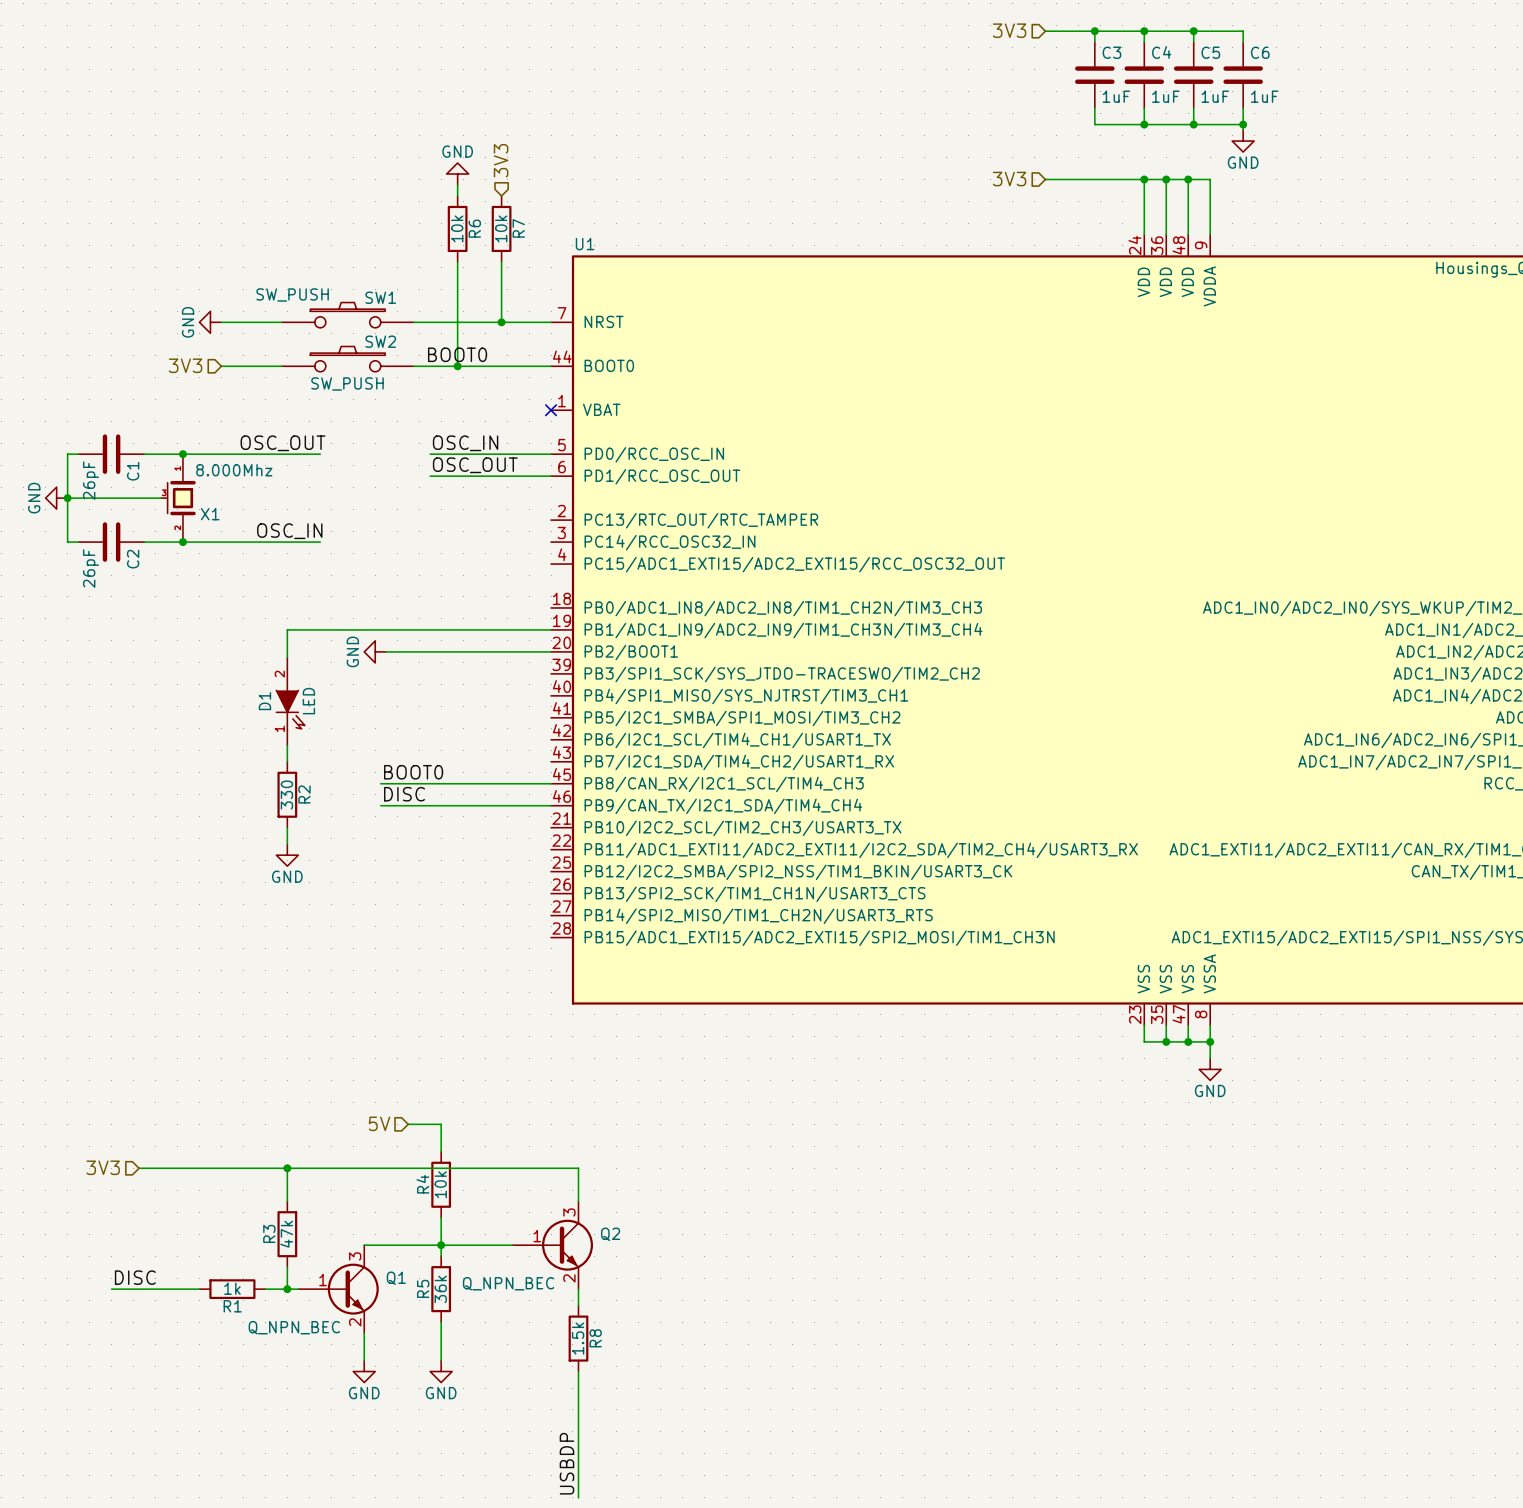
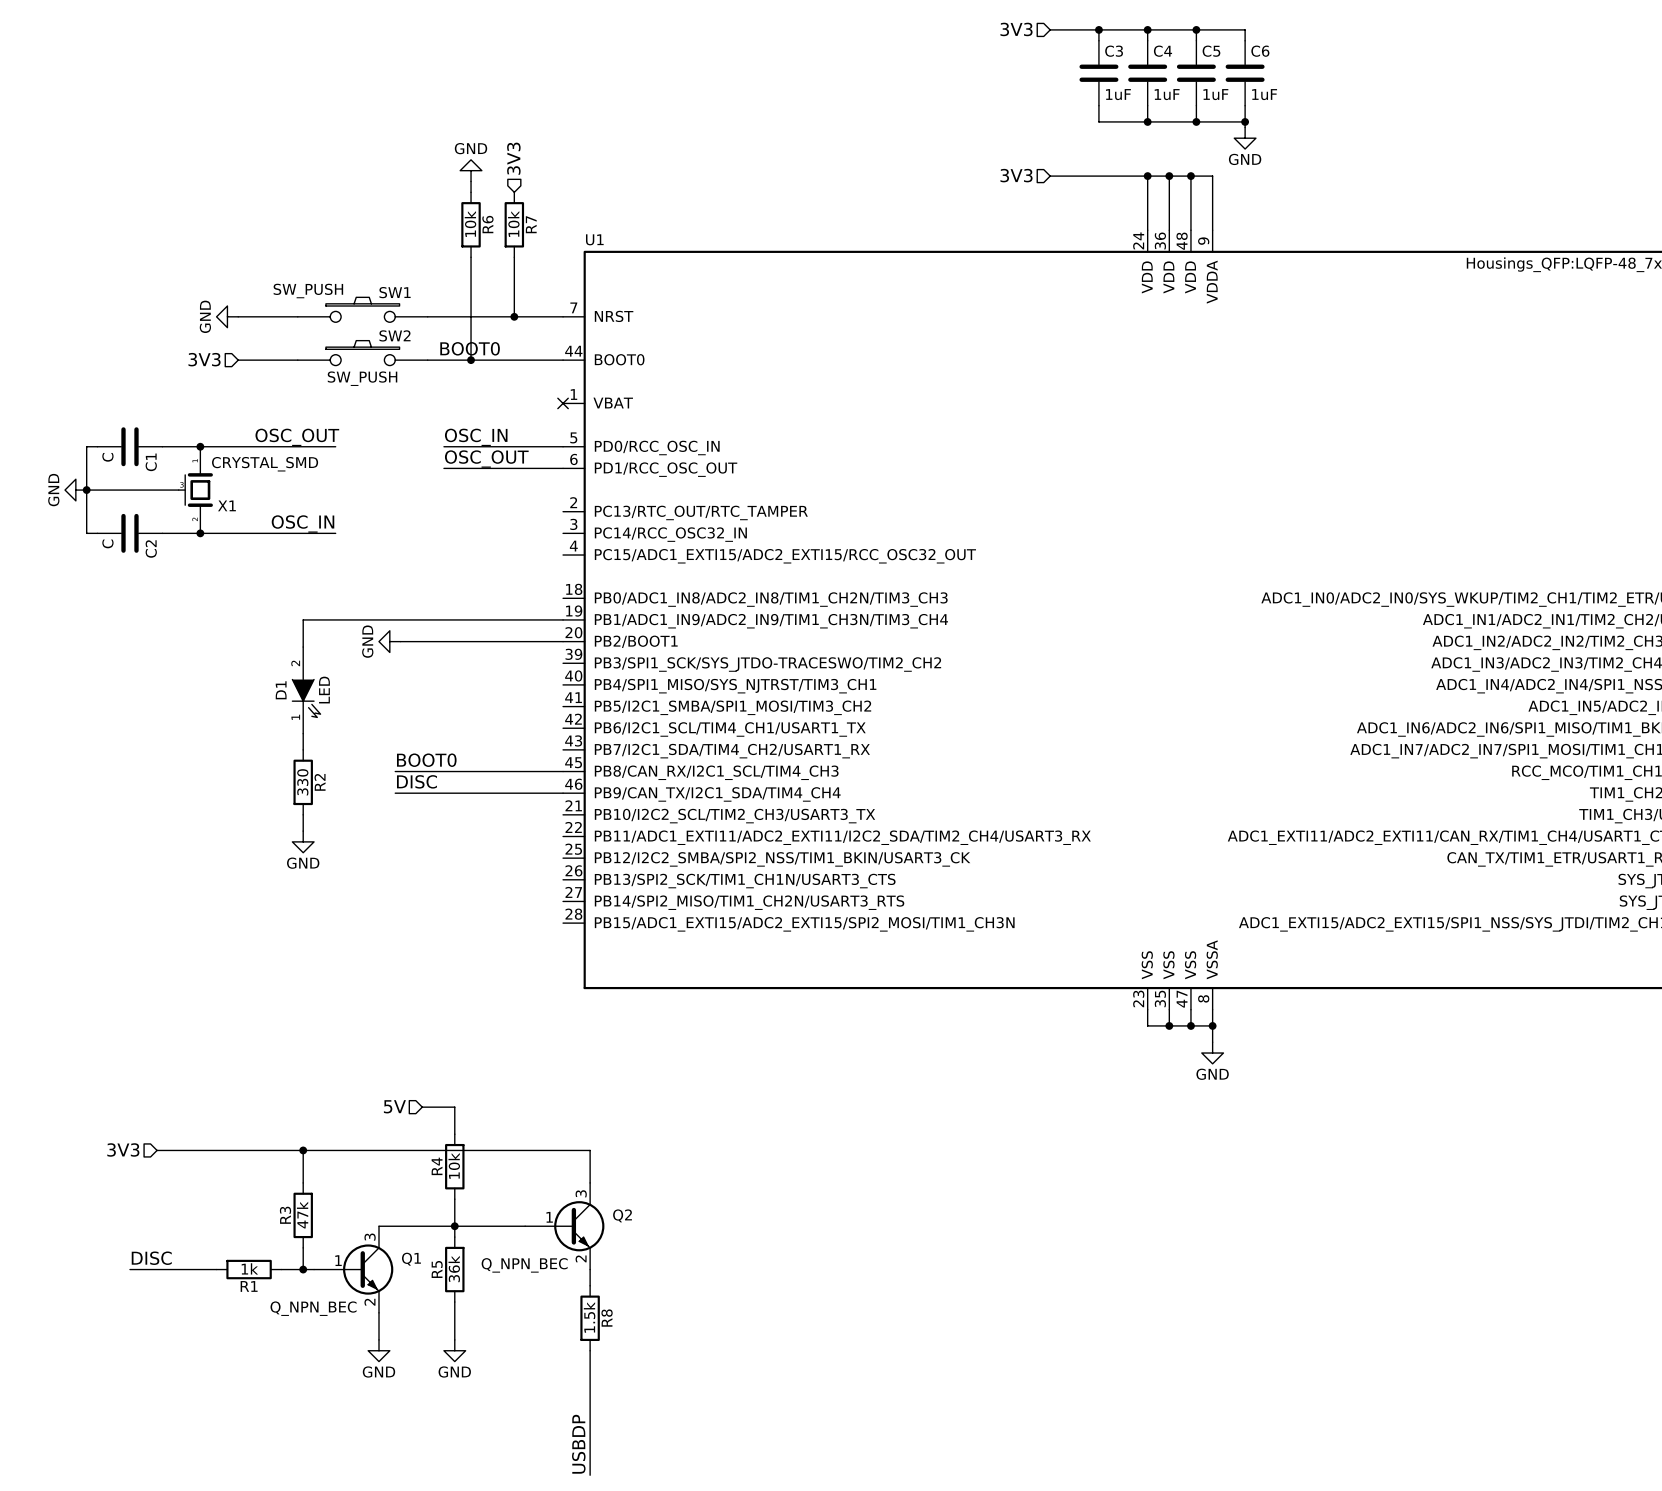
X1 value: 8.000Mhz (234, 470) -> CRYSTAL_SMD (265, 464)
C1 value: 26pF (91, 480) -> C (107, 457)
C2 value: 26pF (91, 568) -> C (107, 543)

